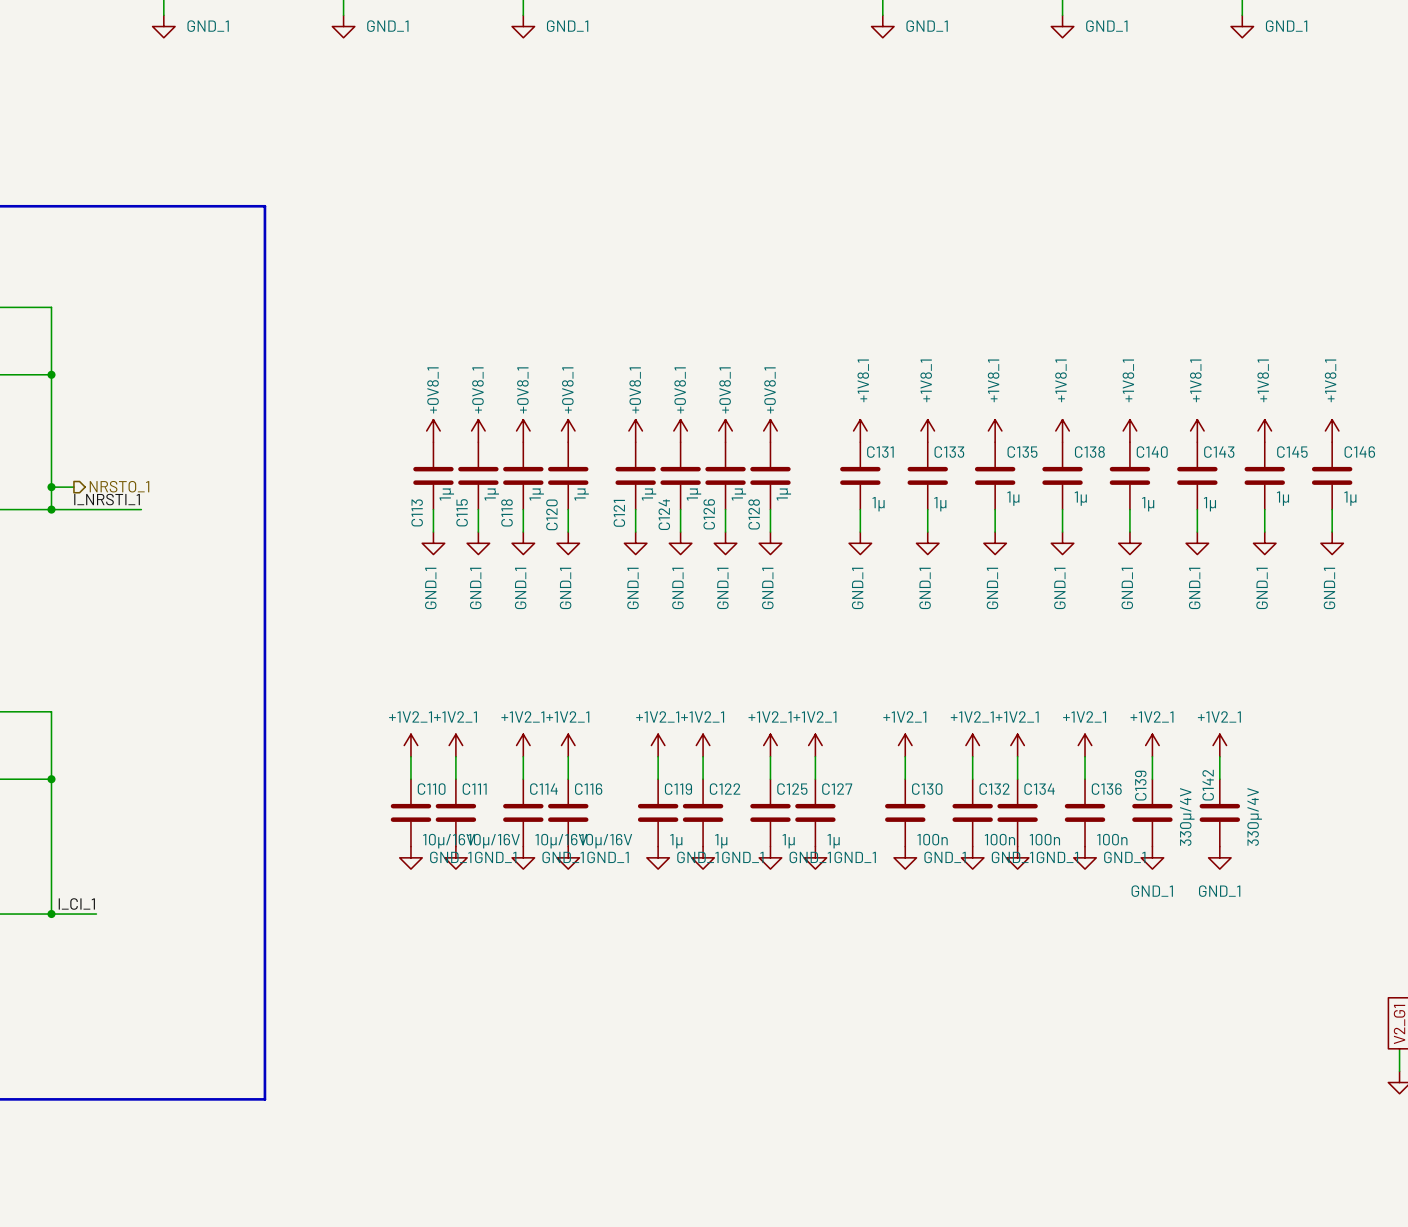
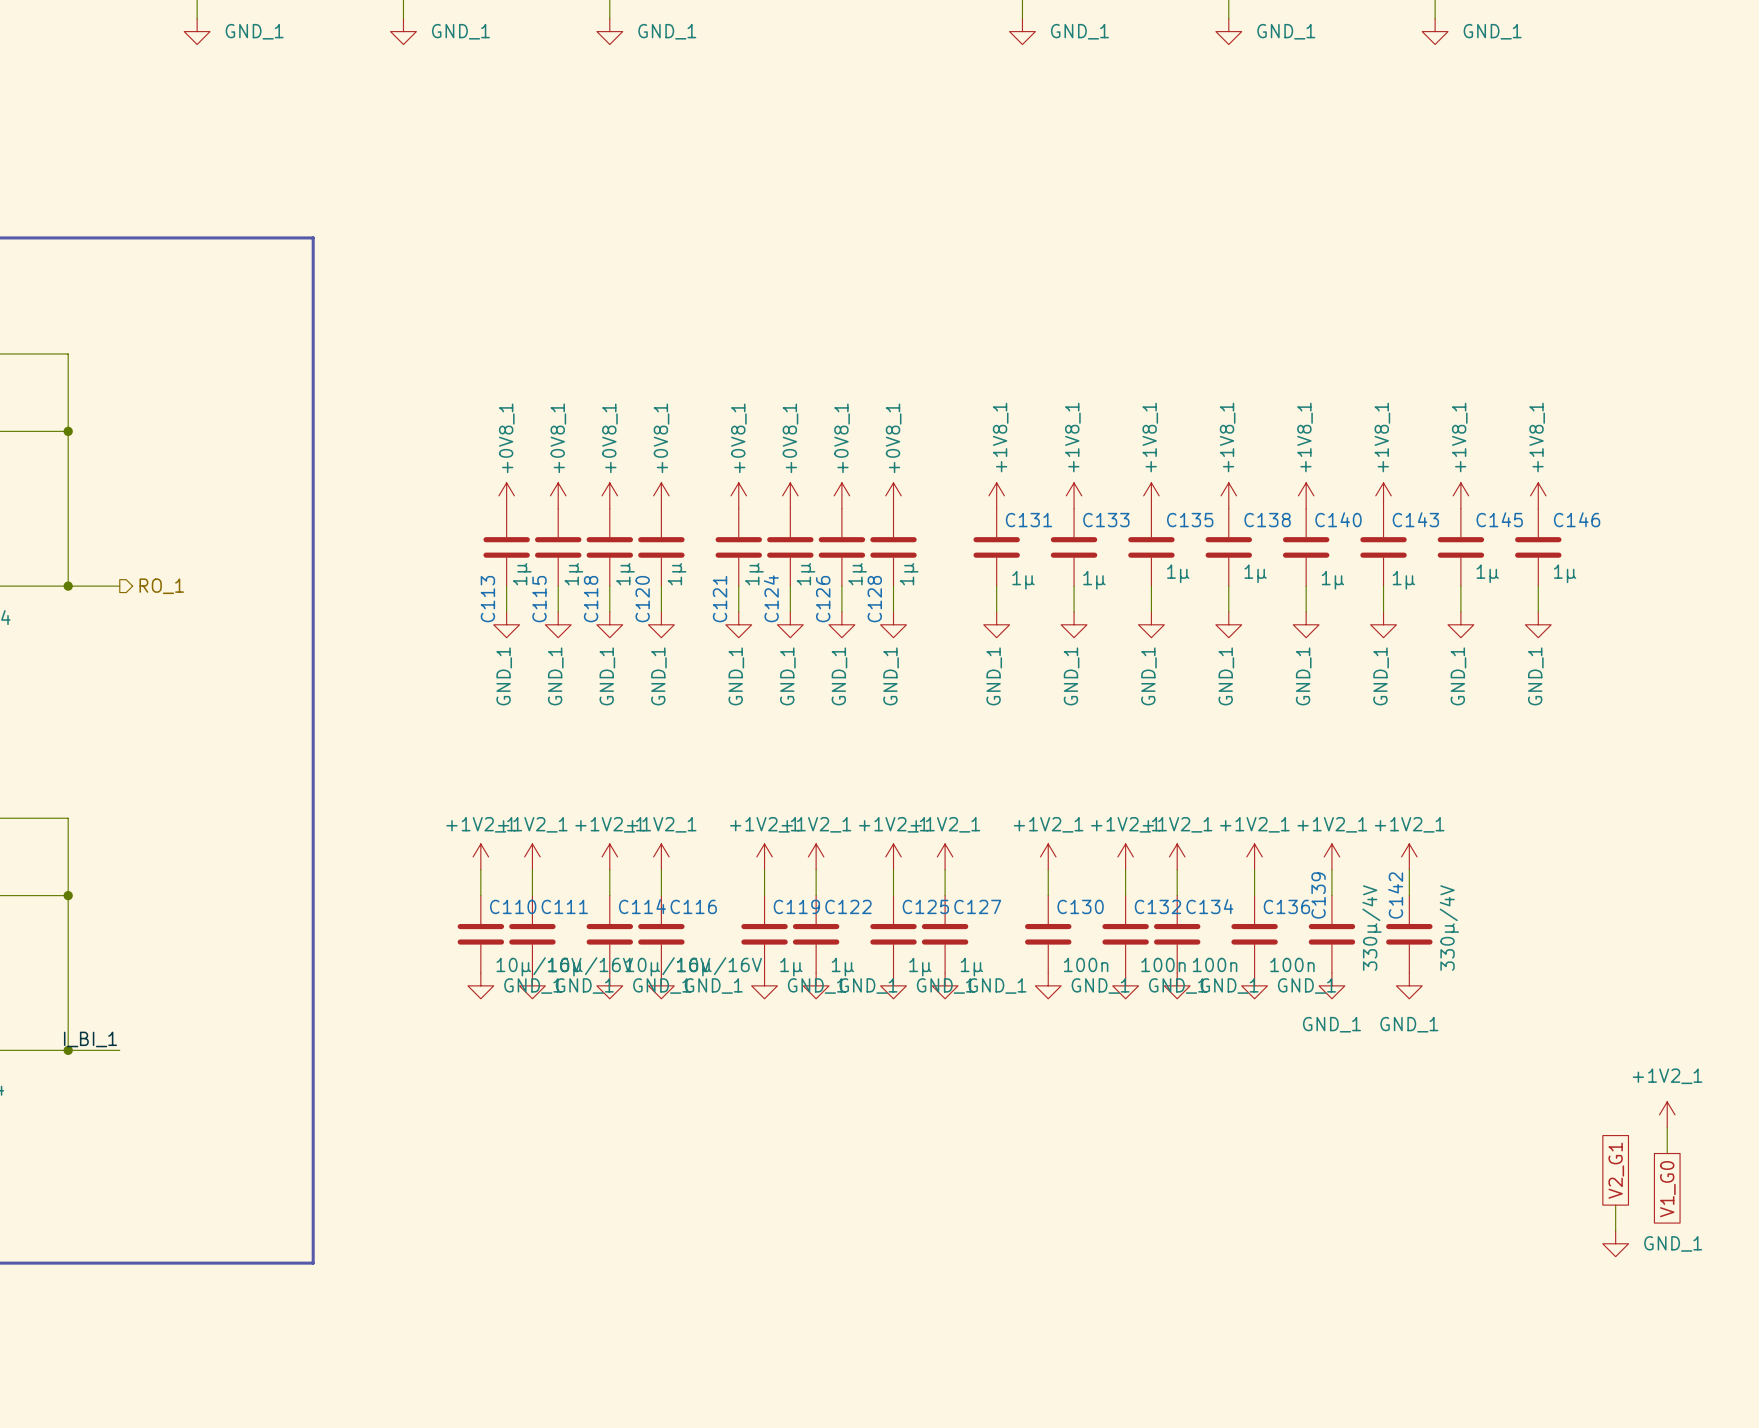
hierarchical label: NRSTO_1 (119, 486) -> RO_1 (161, 586)
wire: (51, 487) (73, 487) -> none
junction: (51, 487) -> none
label: I_NRSTI_1 (107, 499) -> none
wire: (96, 509) (141, 509) -> none
label: I_CI_1 (76, 904) -> I_BI_1 (90, 1039)

